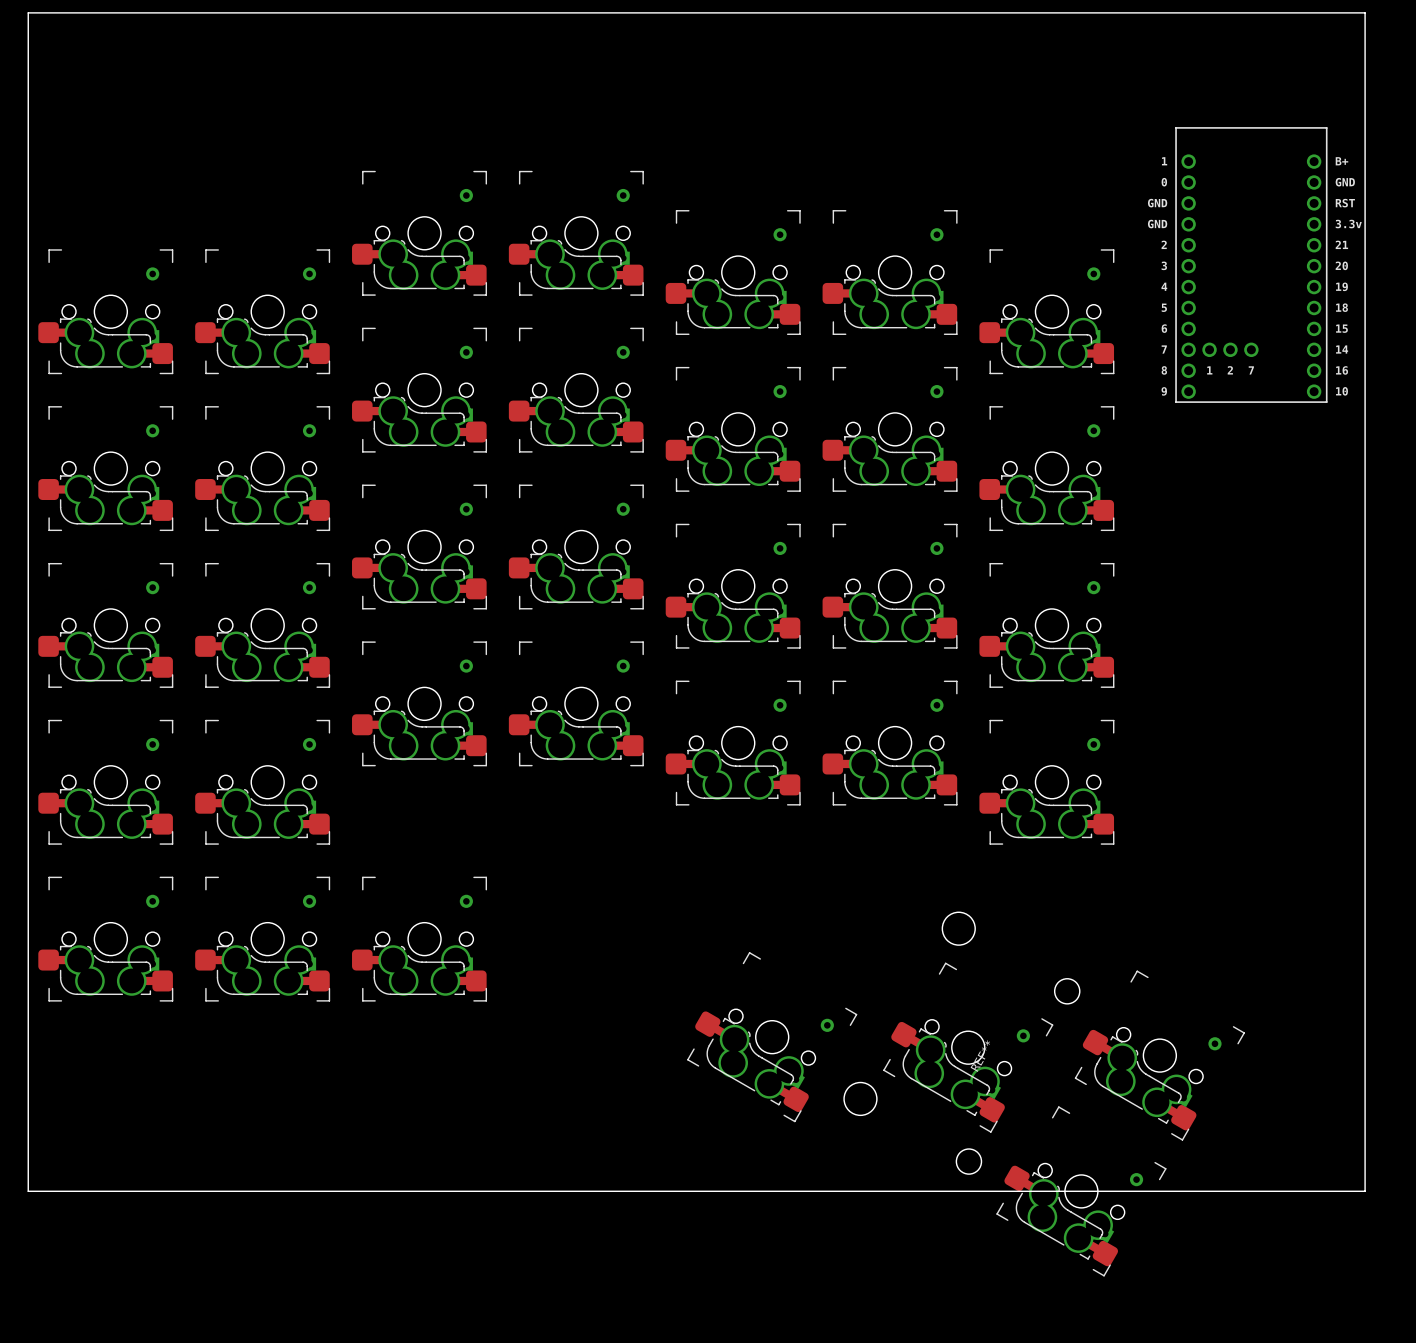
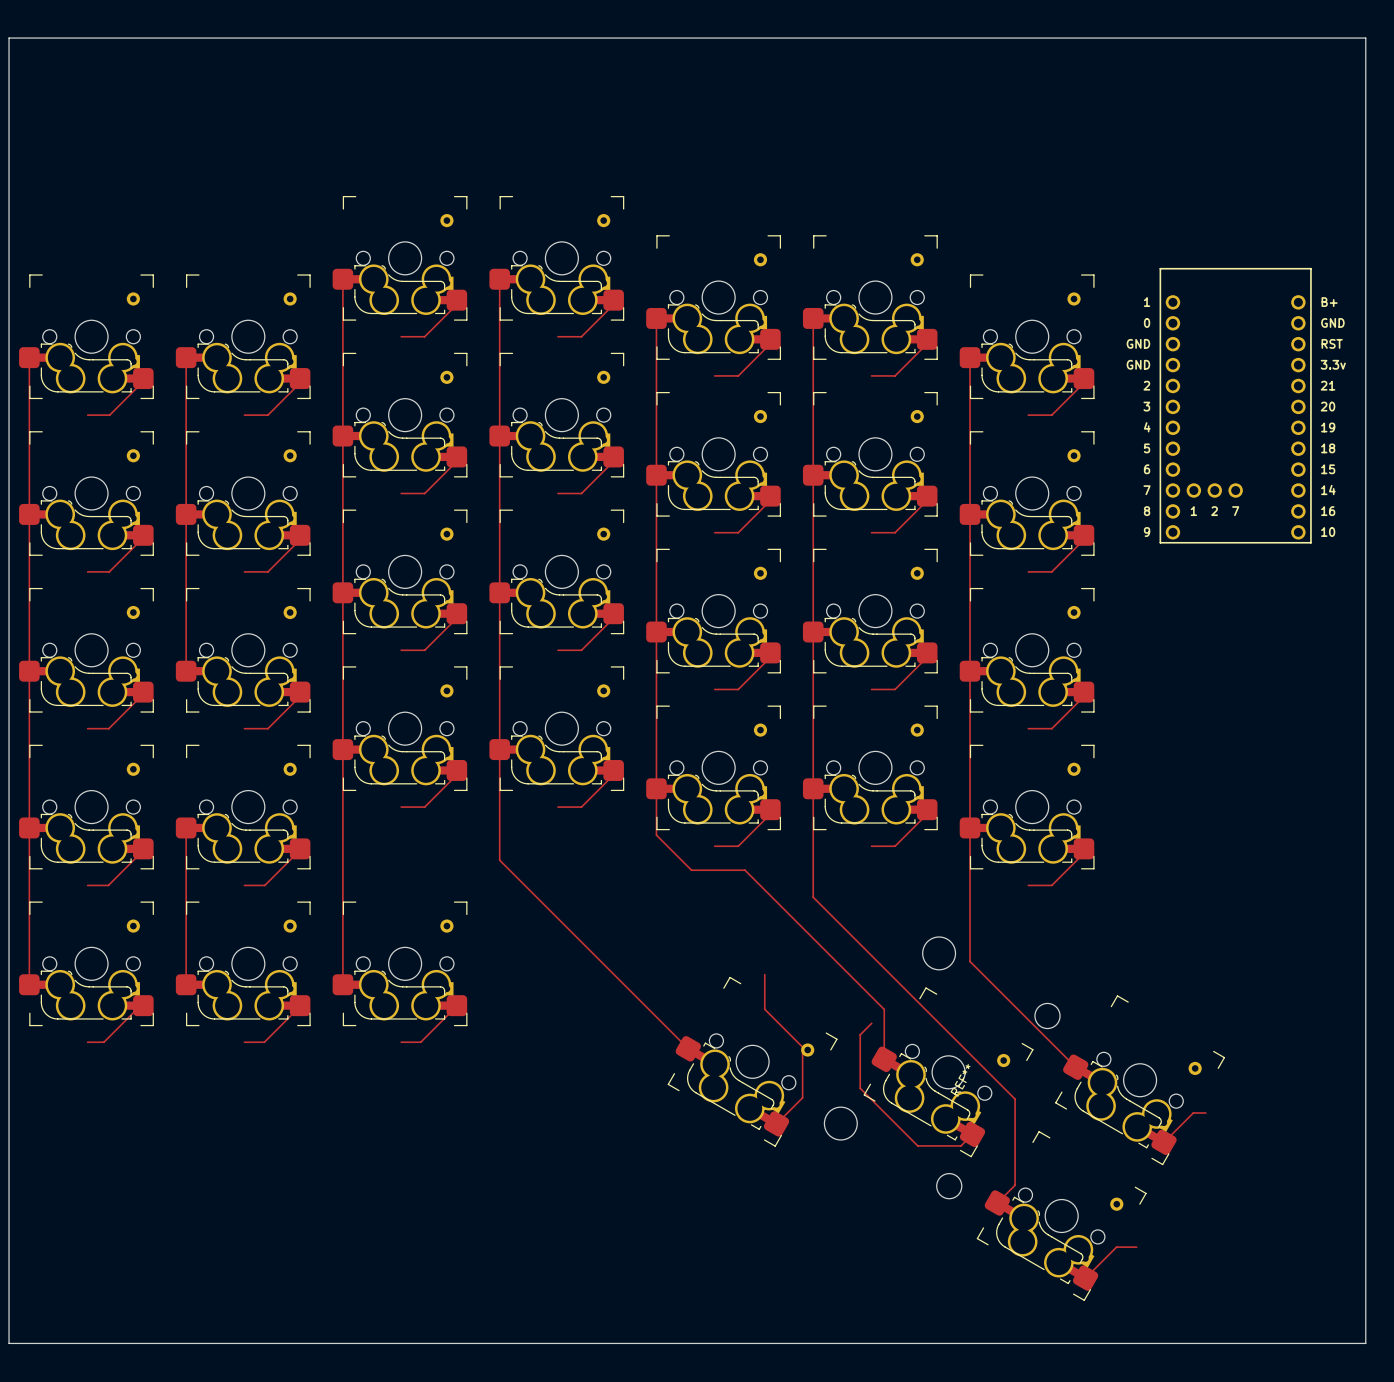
board edge: (1365, 12) (1365, 1191) (28, 1191) -> (1345, 38) (1365, 38) (1365, 1343) (9, 1343) (9, 1215)
track: none -> (342, 279) (342, 984)
track: none -> (499, 279) (499, 860) (688, 1048)
part position: (1251, 265) -> (1235, 405)
track: none -> (456, 300) (456, 304) (424, 336) (401, 336)
track: none -> (613, 300) (613, 304) (581, 336) (557, 336)
track: none -> (656, 318) (656, 835) (691, 870) (745, 870) (884, 1009) (884, 1059)
track: none -> (813, 318) (813, 897) (1015, 1099) (1015, 1185) (992, 1207)
track: none -> (770, 339) (770, 343) (738, 375) (714, 375)
track: none -> (927, 339) (927, 343) (895, 375) (871, 375)
track: none -> (29, 357) (29, 984)
track: none -> (186, 357) (186, 671)
track: none -> (970, 357) (970, 961) (1075, 1067)
track: none -> (143, 378) (143, 381) (109, 415) (87, 415)
track: none -> (300, 378) (300, 382) (267, 415) (244, 415)
track: none -> (1083, 378) (1083, 382) (1051, 415) (1028, 415)
track: none -> (456, 456) (456, 461) (424, 493) (401, 493)
track: none -> (613, 456) (613, 461) (581, 493) (557, 493)
track: none -> (770, 496) (770, 500) (738, 532) (714, 532)
track: none -> (927, 496) (927, 500) (895, 532) (871, 532)
track: none -> (143, 535) (143, 537) (109, 571) (87, 571)
track: none -> (300, 535) (300, 539) (267, 571) (244, 571)
track: none -> (1083, 535) (1083, 539) (1051, 571) (1028, 571)
track: none -> (456, 613) (456, 618) (424, 650) (401, 650)
track: none -> (613, 613) (613, 618) (581, 650) (557, 650)
track: none -> (770, 652) (770, 657) (738, 689) (714, 689)
track: none -> (927, 652) (927, 657) (895, 689) (871, 689)
track: none -> (143, 692) (108, 728) (87, 728)
track: none -> (300, 692) (300, 696) (267, 728) (244, 728)
track: none -> (1083, 692) (1083, 696) (1051, 728) (1028, 728)
track: none -> (456, 770) (456, 774) (424, 807) (401, 807)
track: none -> (613, 770) (613, 774) (581, 807) (557, 807)
track: none -> (770, 809) (770, 814) (738, 846) (714, 846)
track: none -> (927, 809) (927, 814) (895, 846) (871, 846)
track: none -> (186, 827) (186, 984)
track: none -> (143, 848) (108, 885) (87, 885)
track: none -> (300, 848) (264, 885) (244, 885)
track: none -> (1083, 848) (1083, 853) (1051, 885) (1028, 885)
track: none -> (764, 974) (764, 1009) (802, 1047) (802, 1097) (776, 1123)
track: none -> (140, 1005) (103, 1042) (87, 1042)
track: none -> (300, 1005) (264, 1042) (244, 1042)
track: none -> (456, 1005) (420, 1042) (401, 1042)
track: none -> (871, 1023) (860, 1034) (860, 1088) (917, 1145) (961, 1145) (972, 1134)
track: none -> (1205, 1113) (1193, 1113) (1164, 1142)
track: none -> (1136, 1247) (1116, 1247) (1085, 1278)

